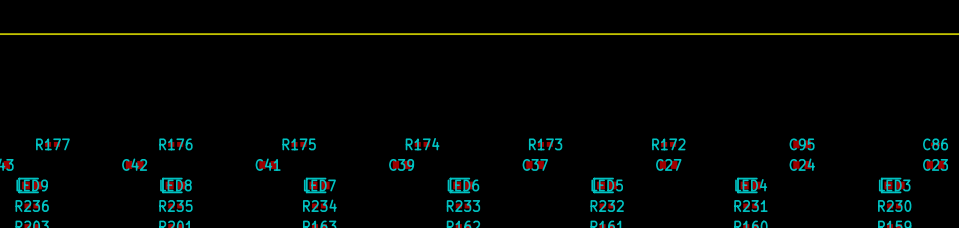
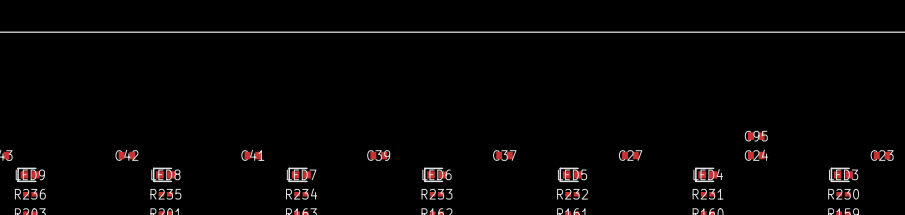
R177: (52, 144) -> none
R176: (175, 144) -> none
R175: (298, 144) -> none
R174: (422, 144) -> none
R173: (545, 144) -> none
R172: (668, 144) -> none
C86: (935, 144) -> none

